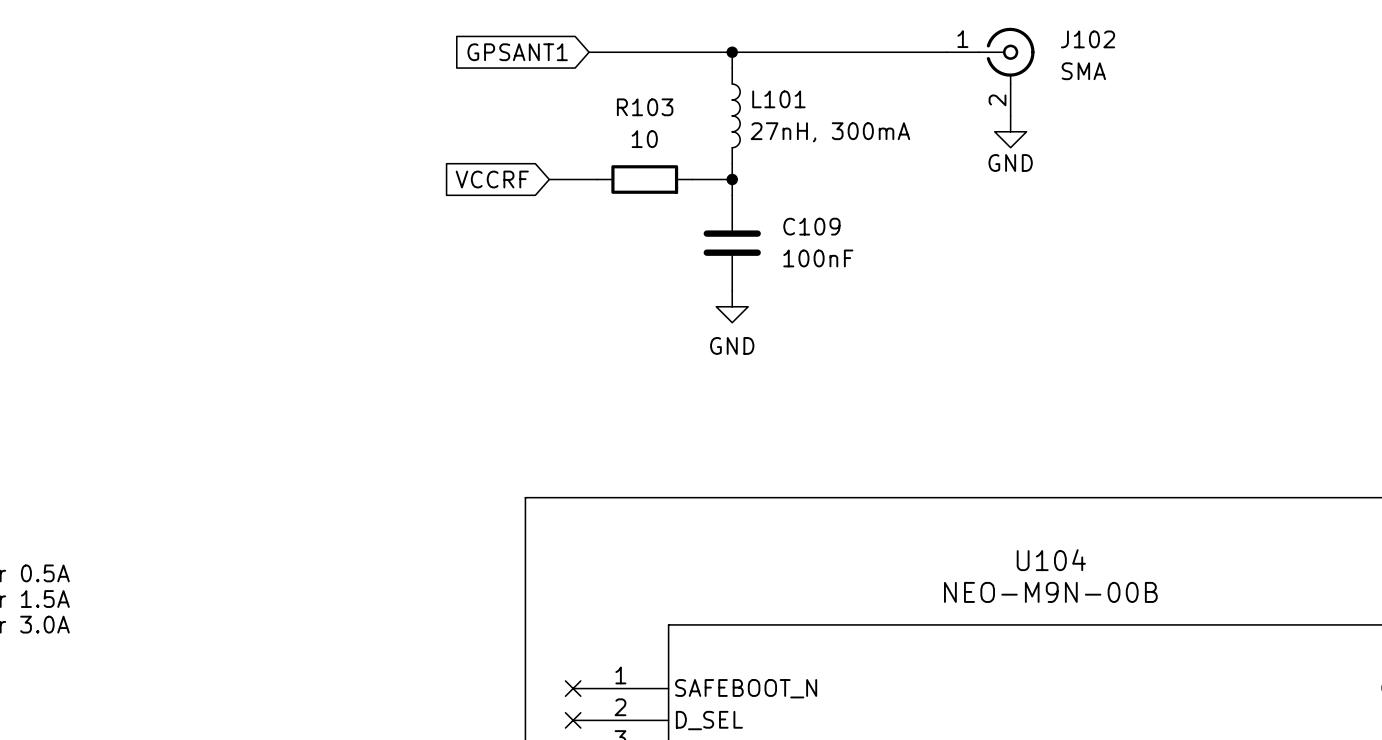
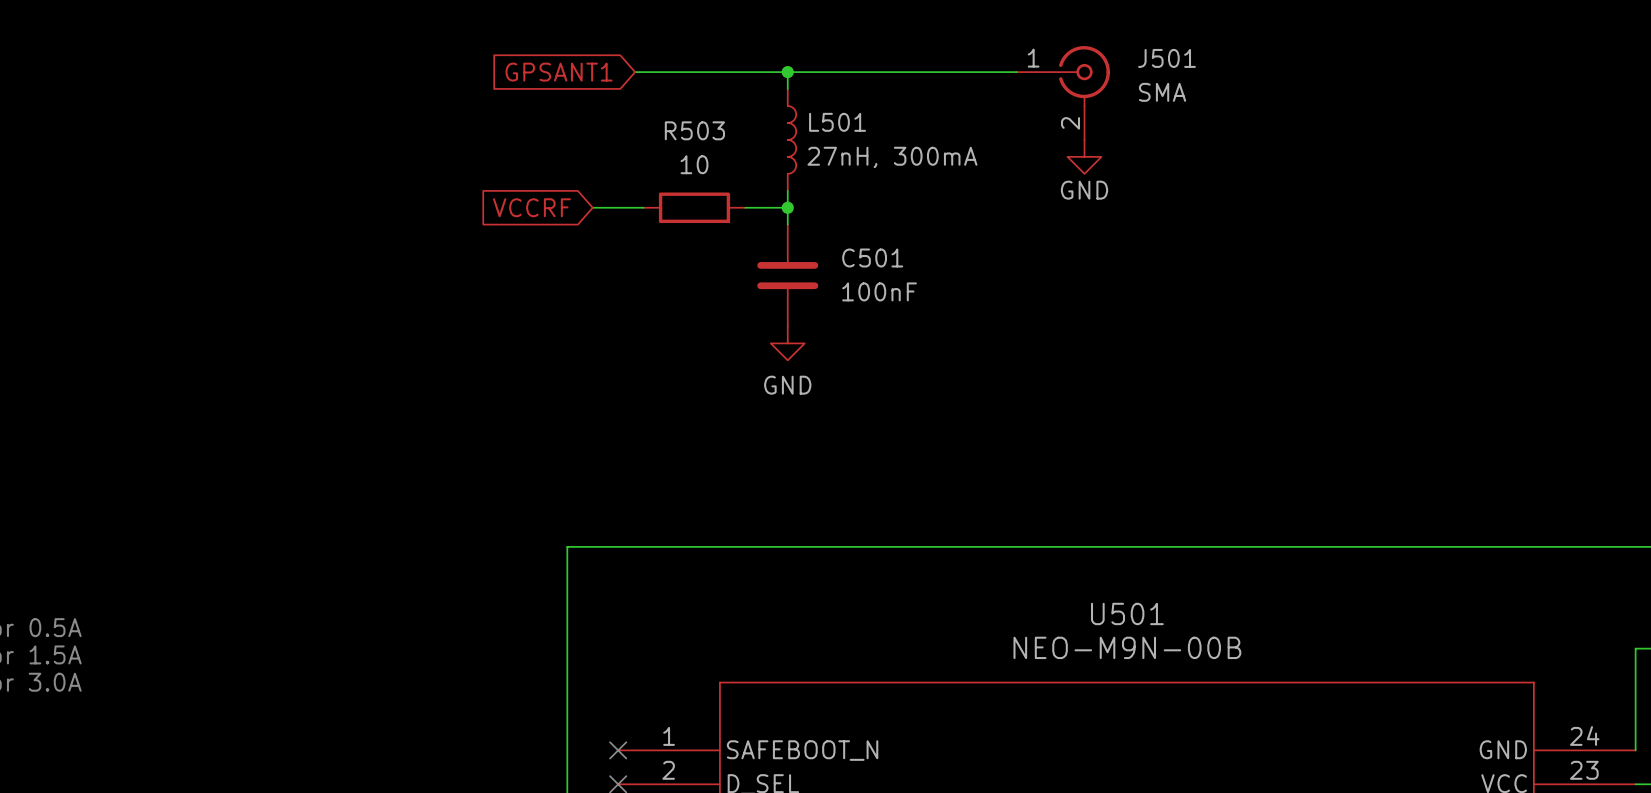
J102 name: J102 (1088, 39) -> J501 (1166, 58)
L101 name: L101 (778, 99) -> L501 (837, 122)
R103 name: R103 (645, 107) -> R503 (694, 130)
C109 name: C109 (811, 226) -> C501 (872, 257)
U104 name: U104 (1051, 560) -> U501 (1127, 613)

